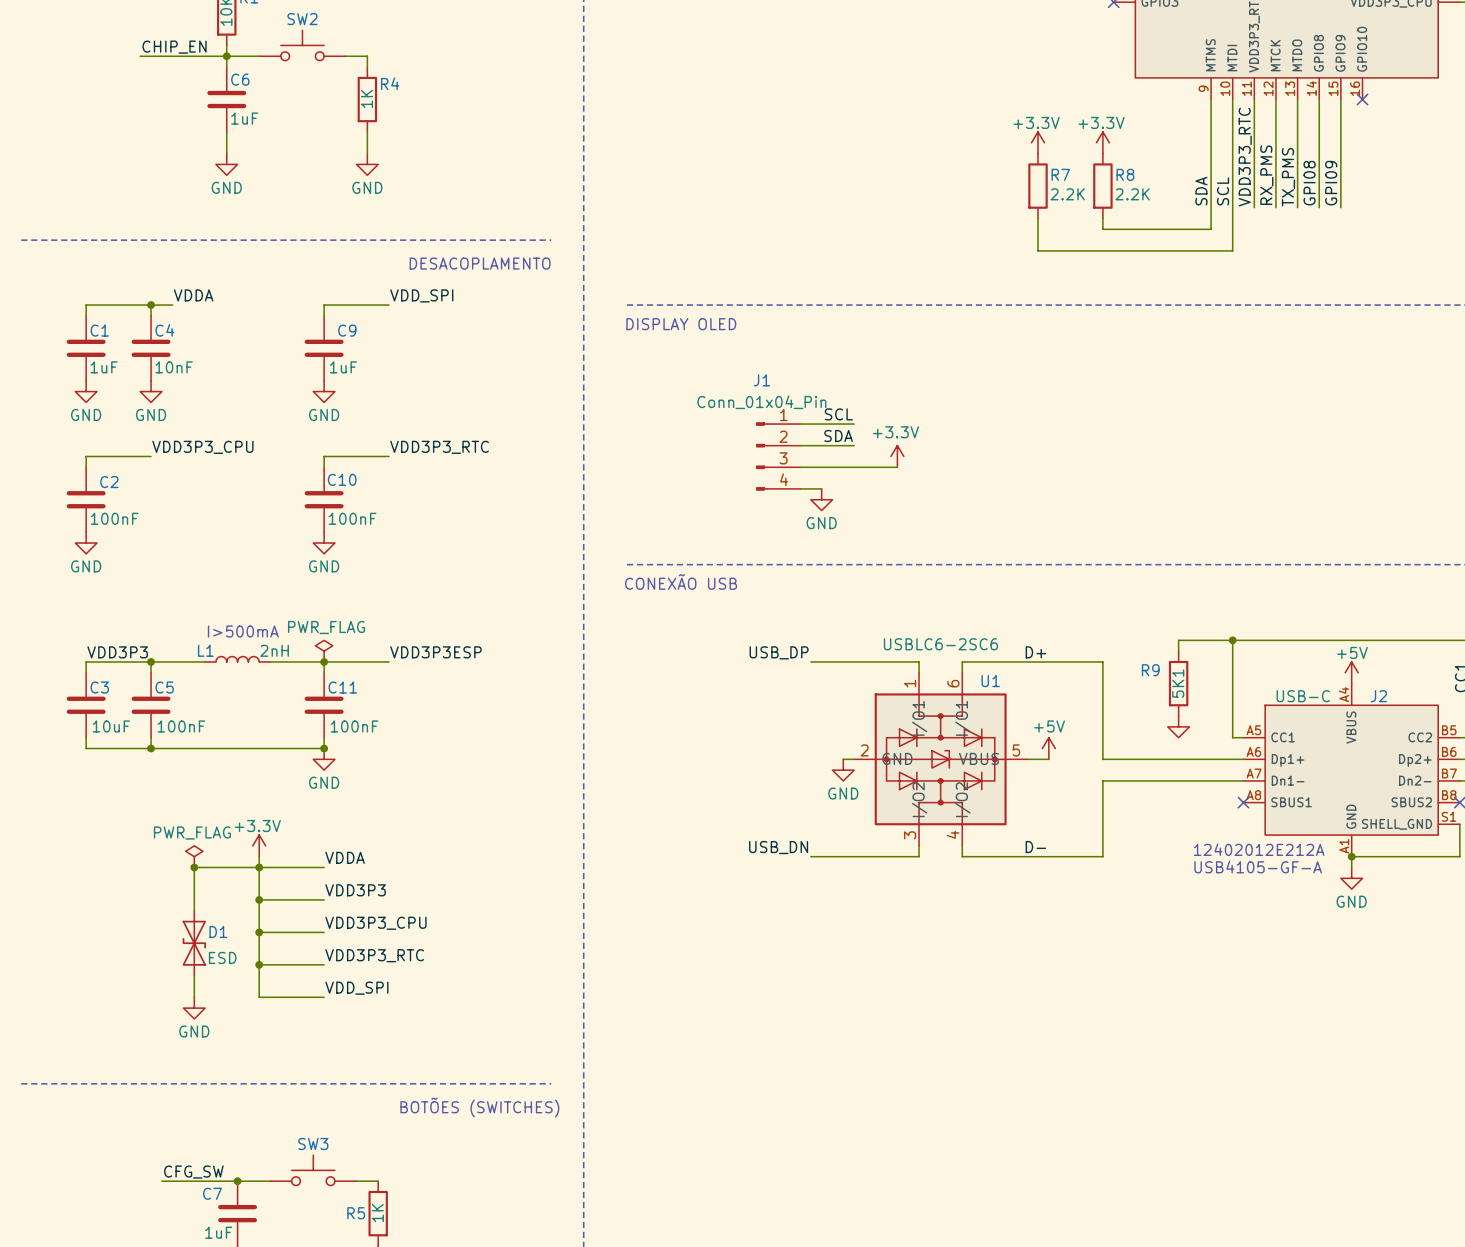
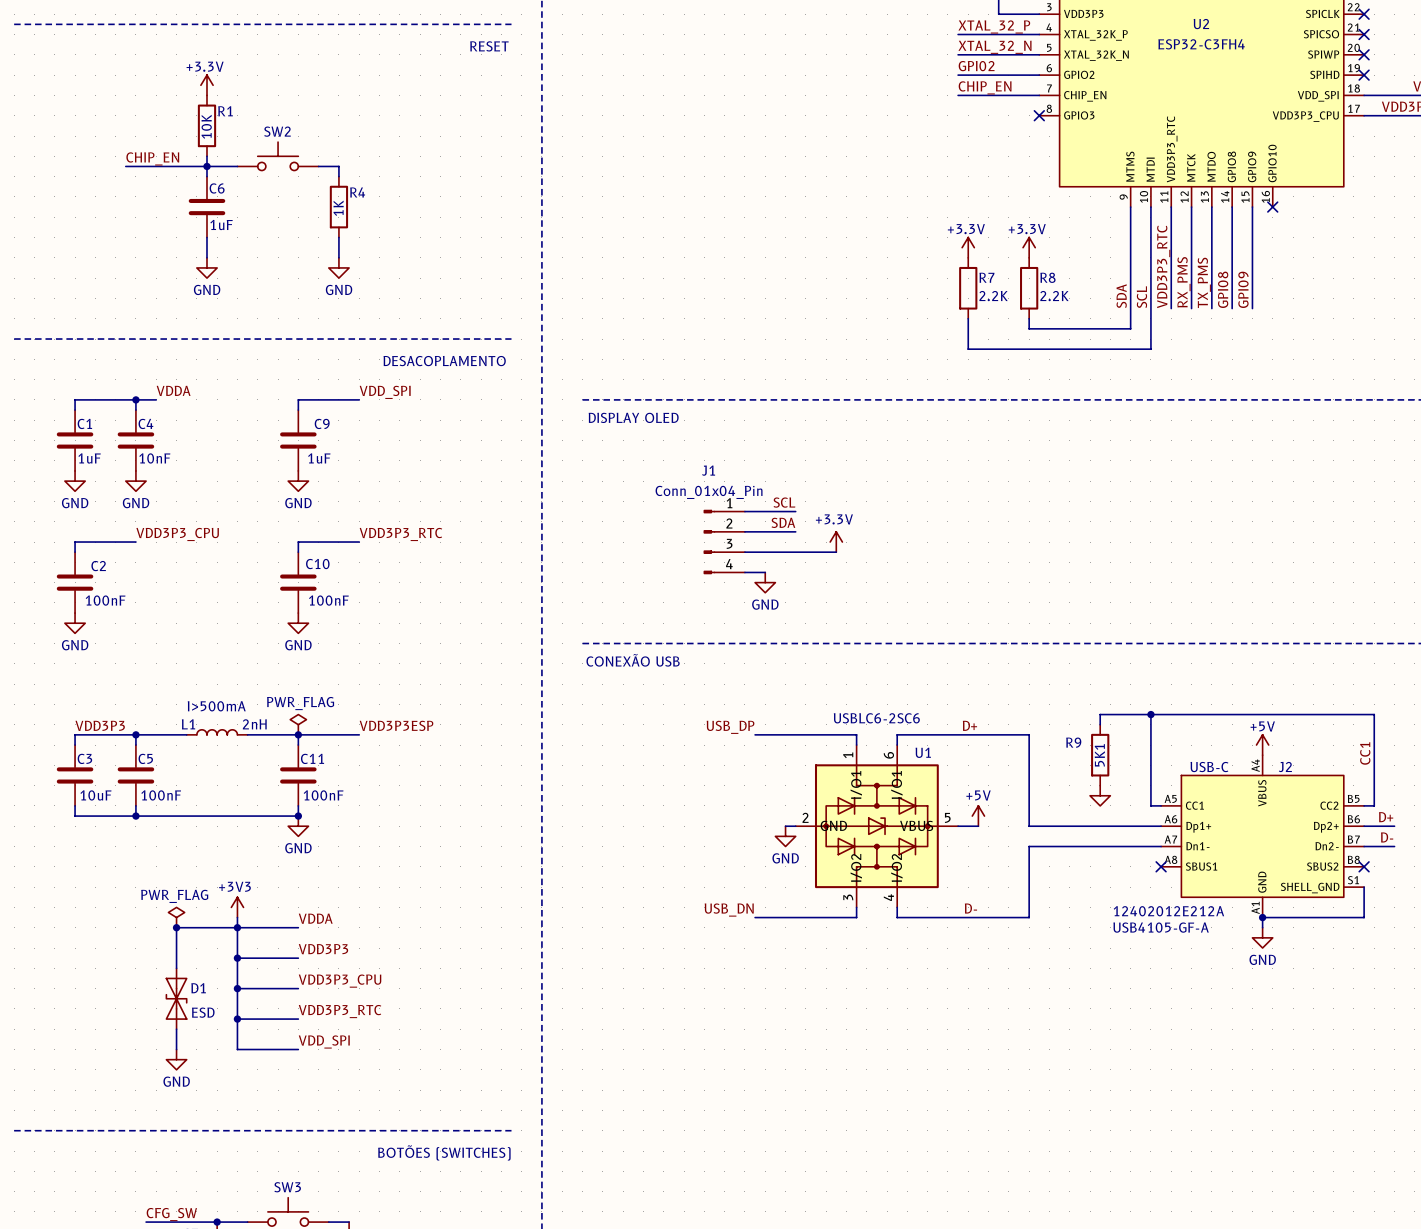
power symbol: +3.3V (259, 845) -> +3V3 (237, 907)

